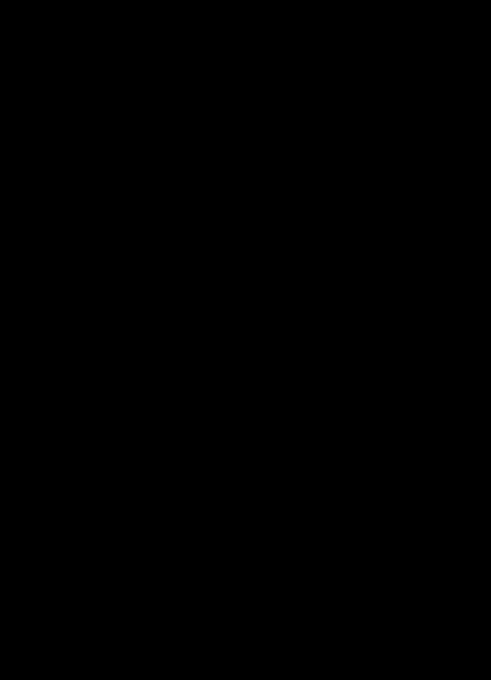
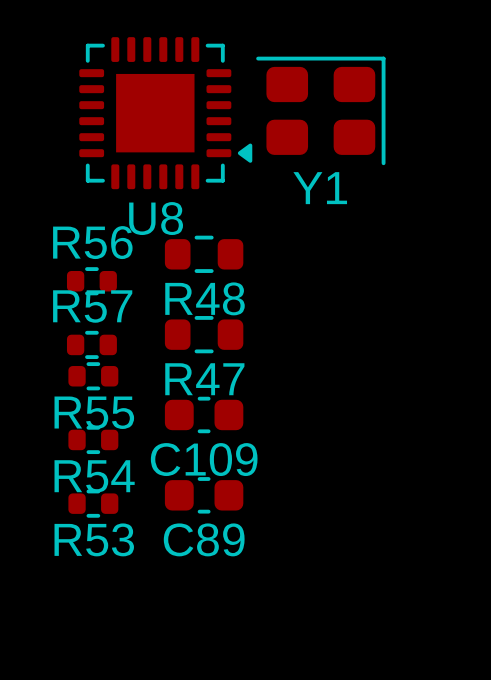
Y1: none -> (320, 110)
U8: none -> (165, 113)
R48: none -> (204, 254)
R56: none -> (91, 281)
R47: none -> (204, 334)
R57: none -> (91, 344)
R55: none -> (93, 376)
C109: none -> (204, 414)
R54: none -> (93, 439)
C89: none -> (204, 495)
R53: none -> (93, 503)

